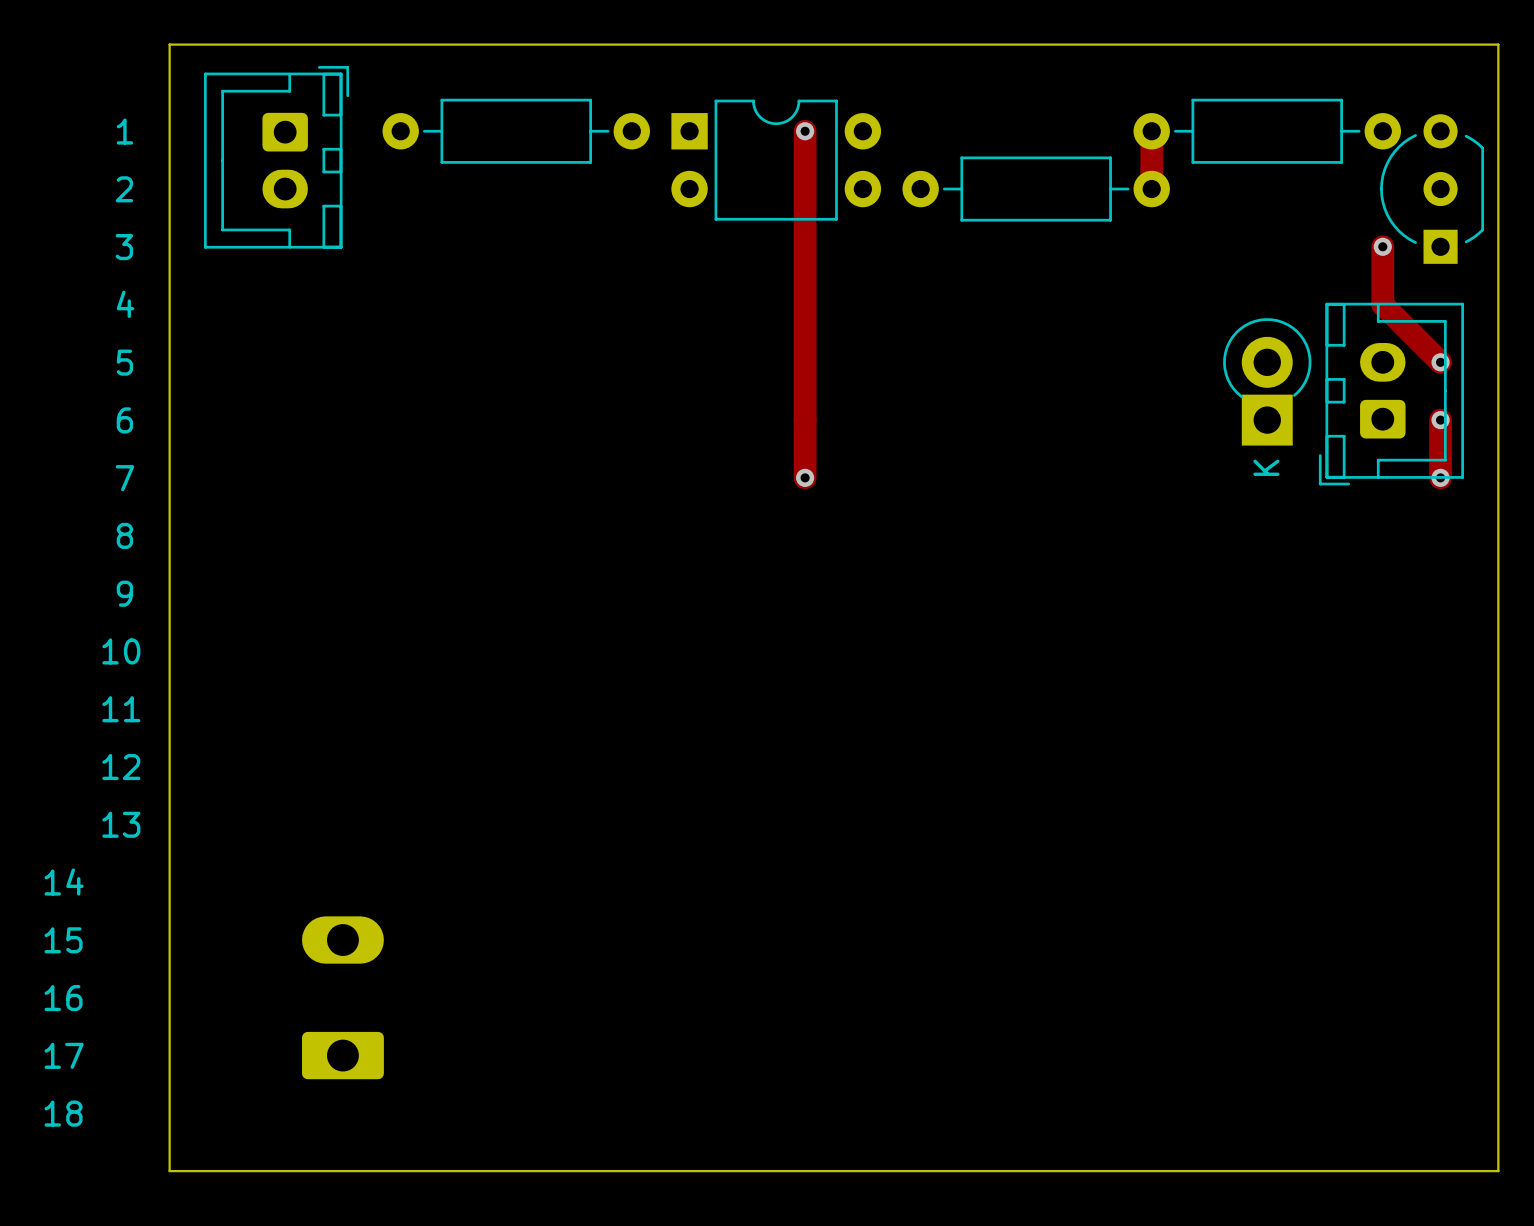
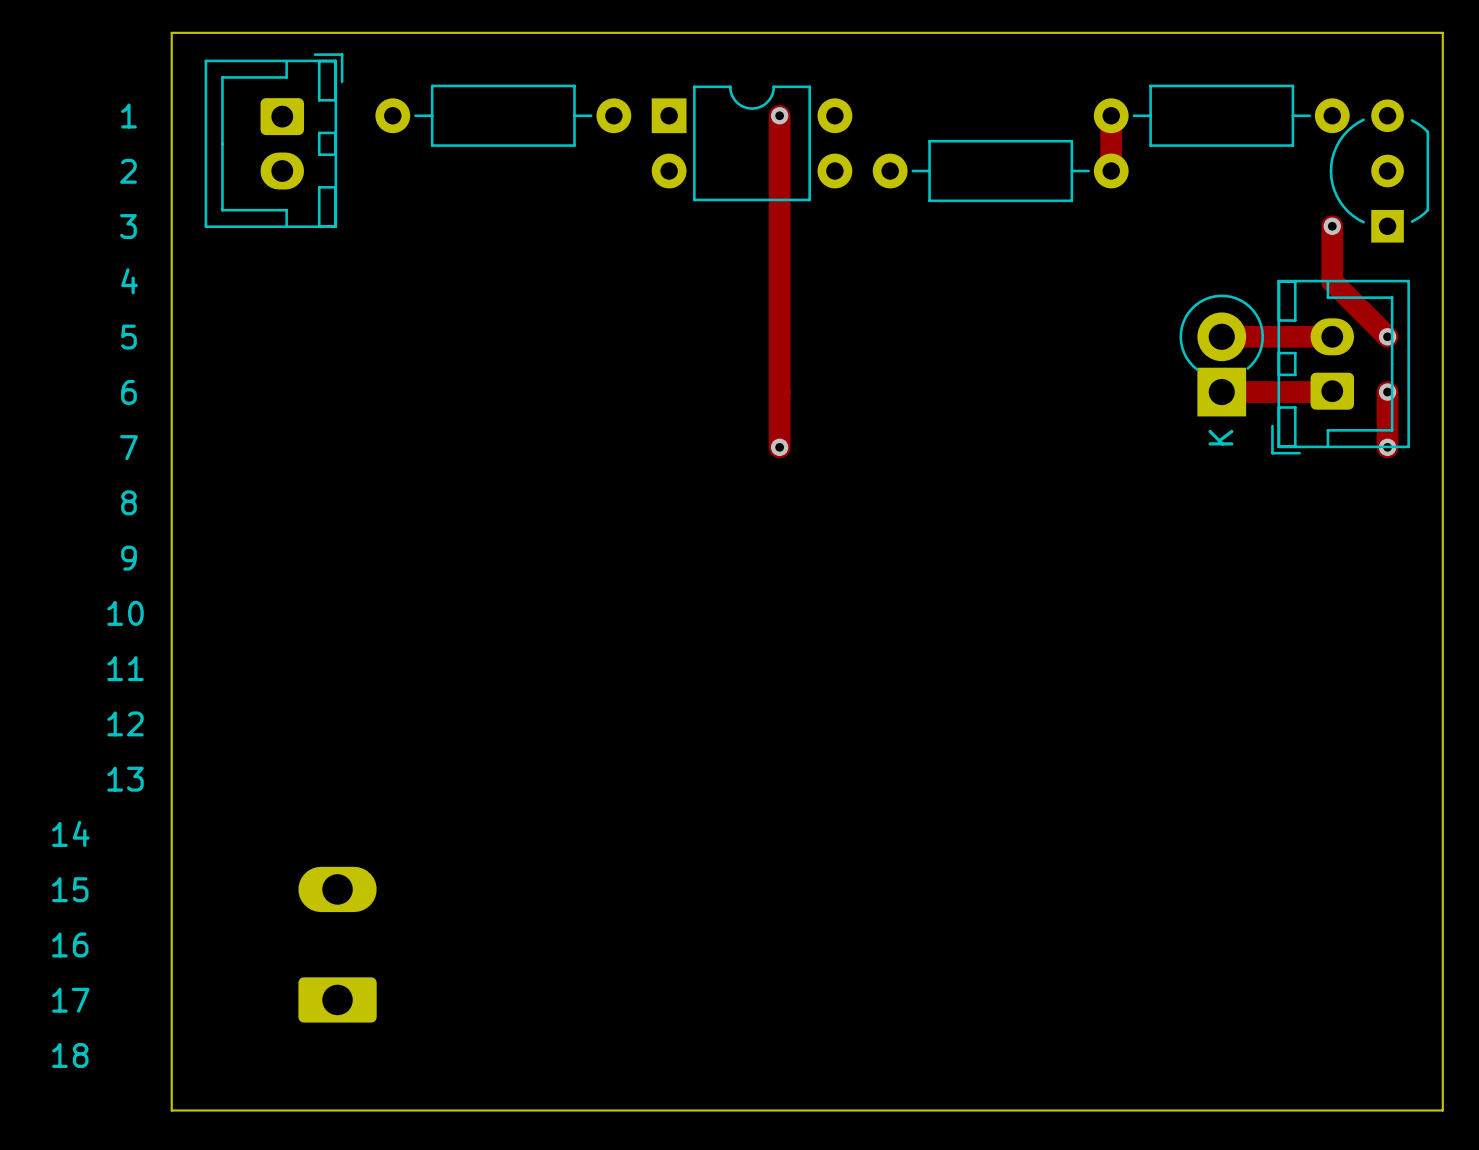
track: none -> (1221, 336) (1332, 336)
track: none -> (1221, 392) (1331, 392)

